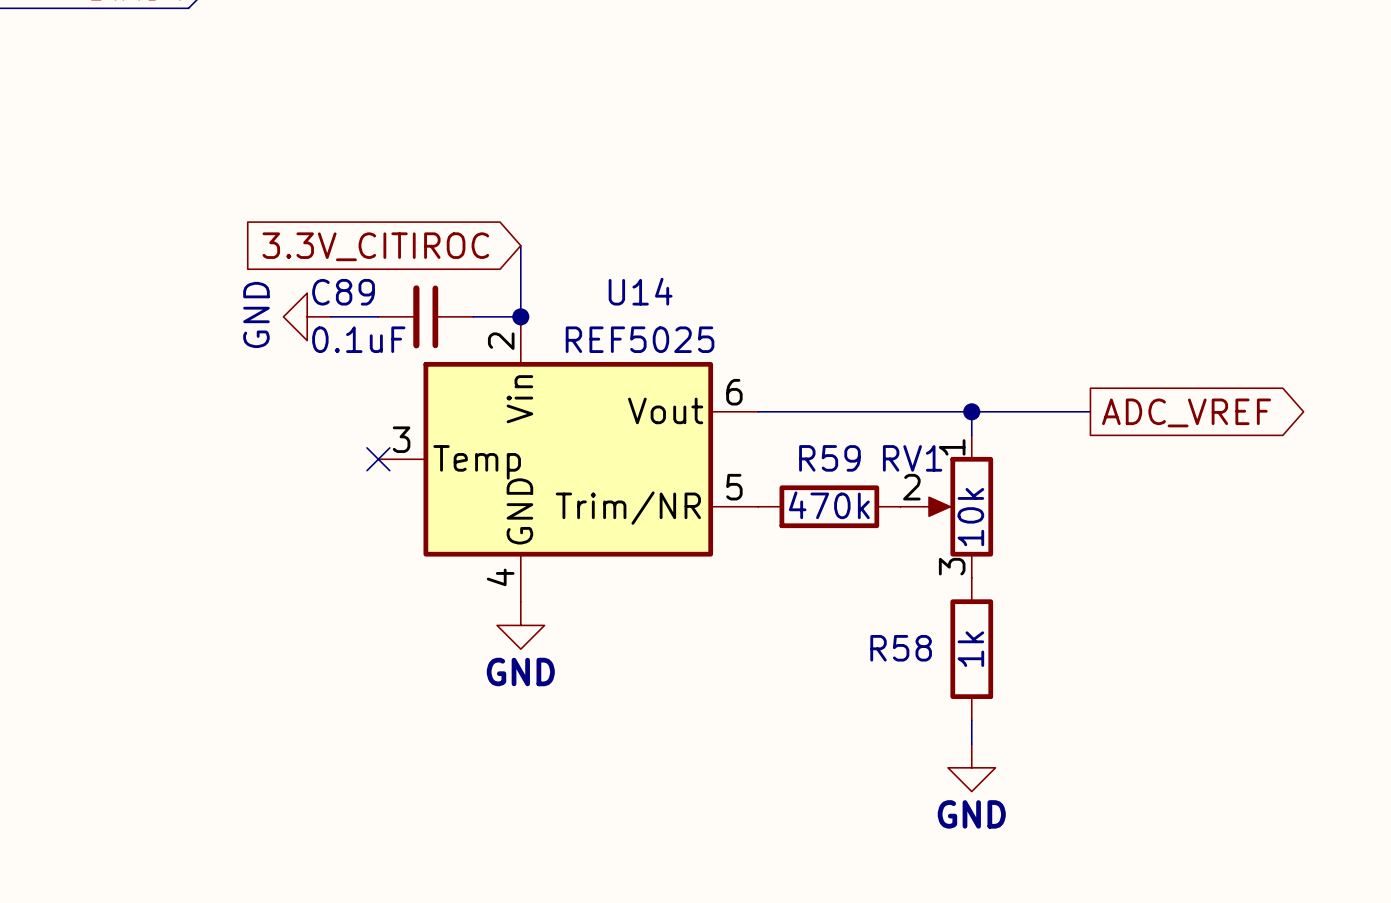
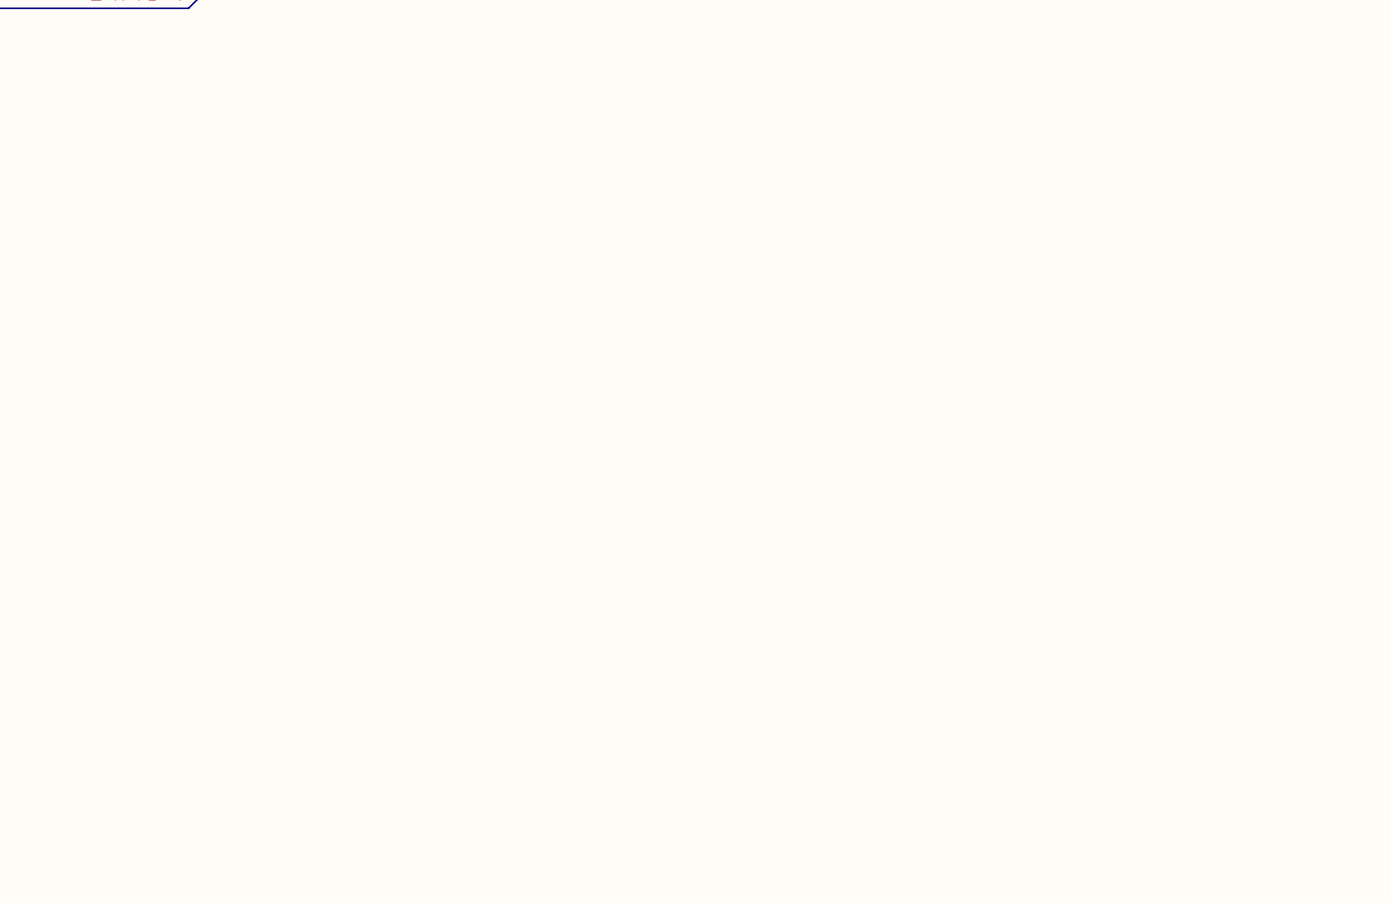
wire: (520, 245) (520, 316) (473, 316) -> none
global label: 3.3V_CITIROC (375, 246) -> none
power symbol: GND (307, 316) -> none
wire: (330, 316) (378, 316) -> none
C89: 0.1uF (425, 316) -> none
junction: (520, 316) -> none
wire: (758, 411) (1090, 411) -> none
wire: (971, 411) (971, 435) -> none
junction: (971, 411) -> none
global label: ADC_VREF (1186, 412) -> none
no-connect mark: (378, 459) -> none
U14: REF5025 (568, 459) -> none
R59: 470k (829, 506) -> none
RV1: 10k (946, 506) -> none
power symbol: GND (520, 625) -> none
R58: 1k (971, 649) -> none
wire: (971, 720) (971, 744) -> none
power symbol: GND (971, 767) -> none

